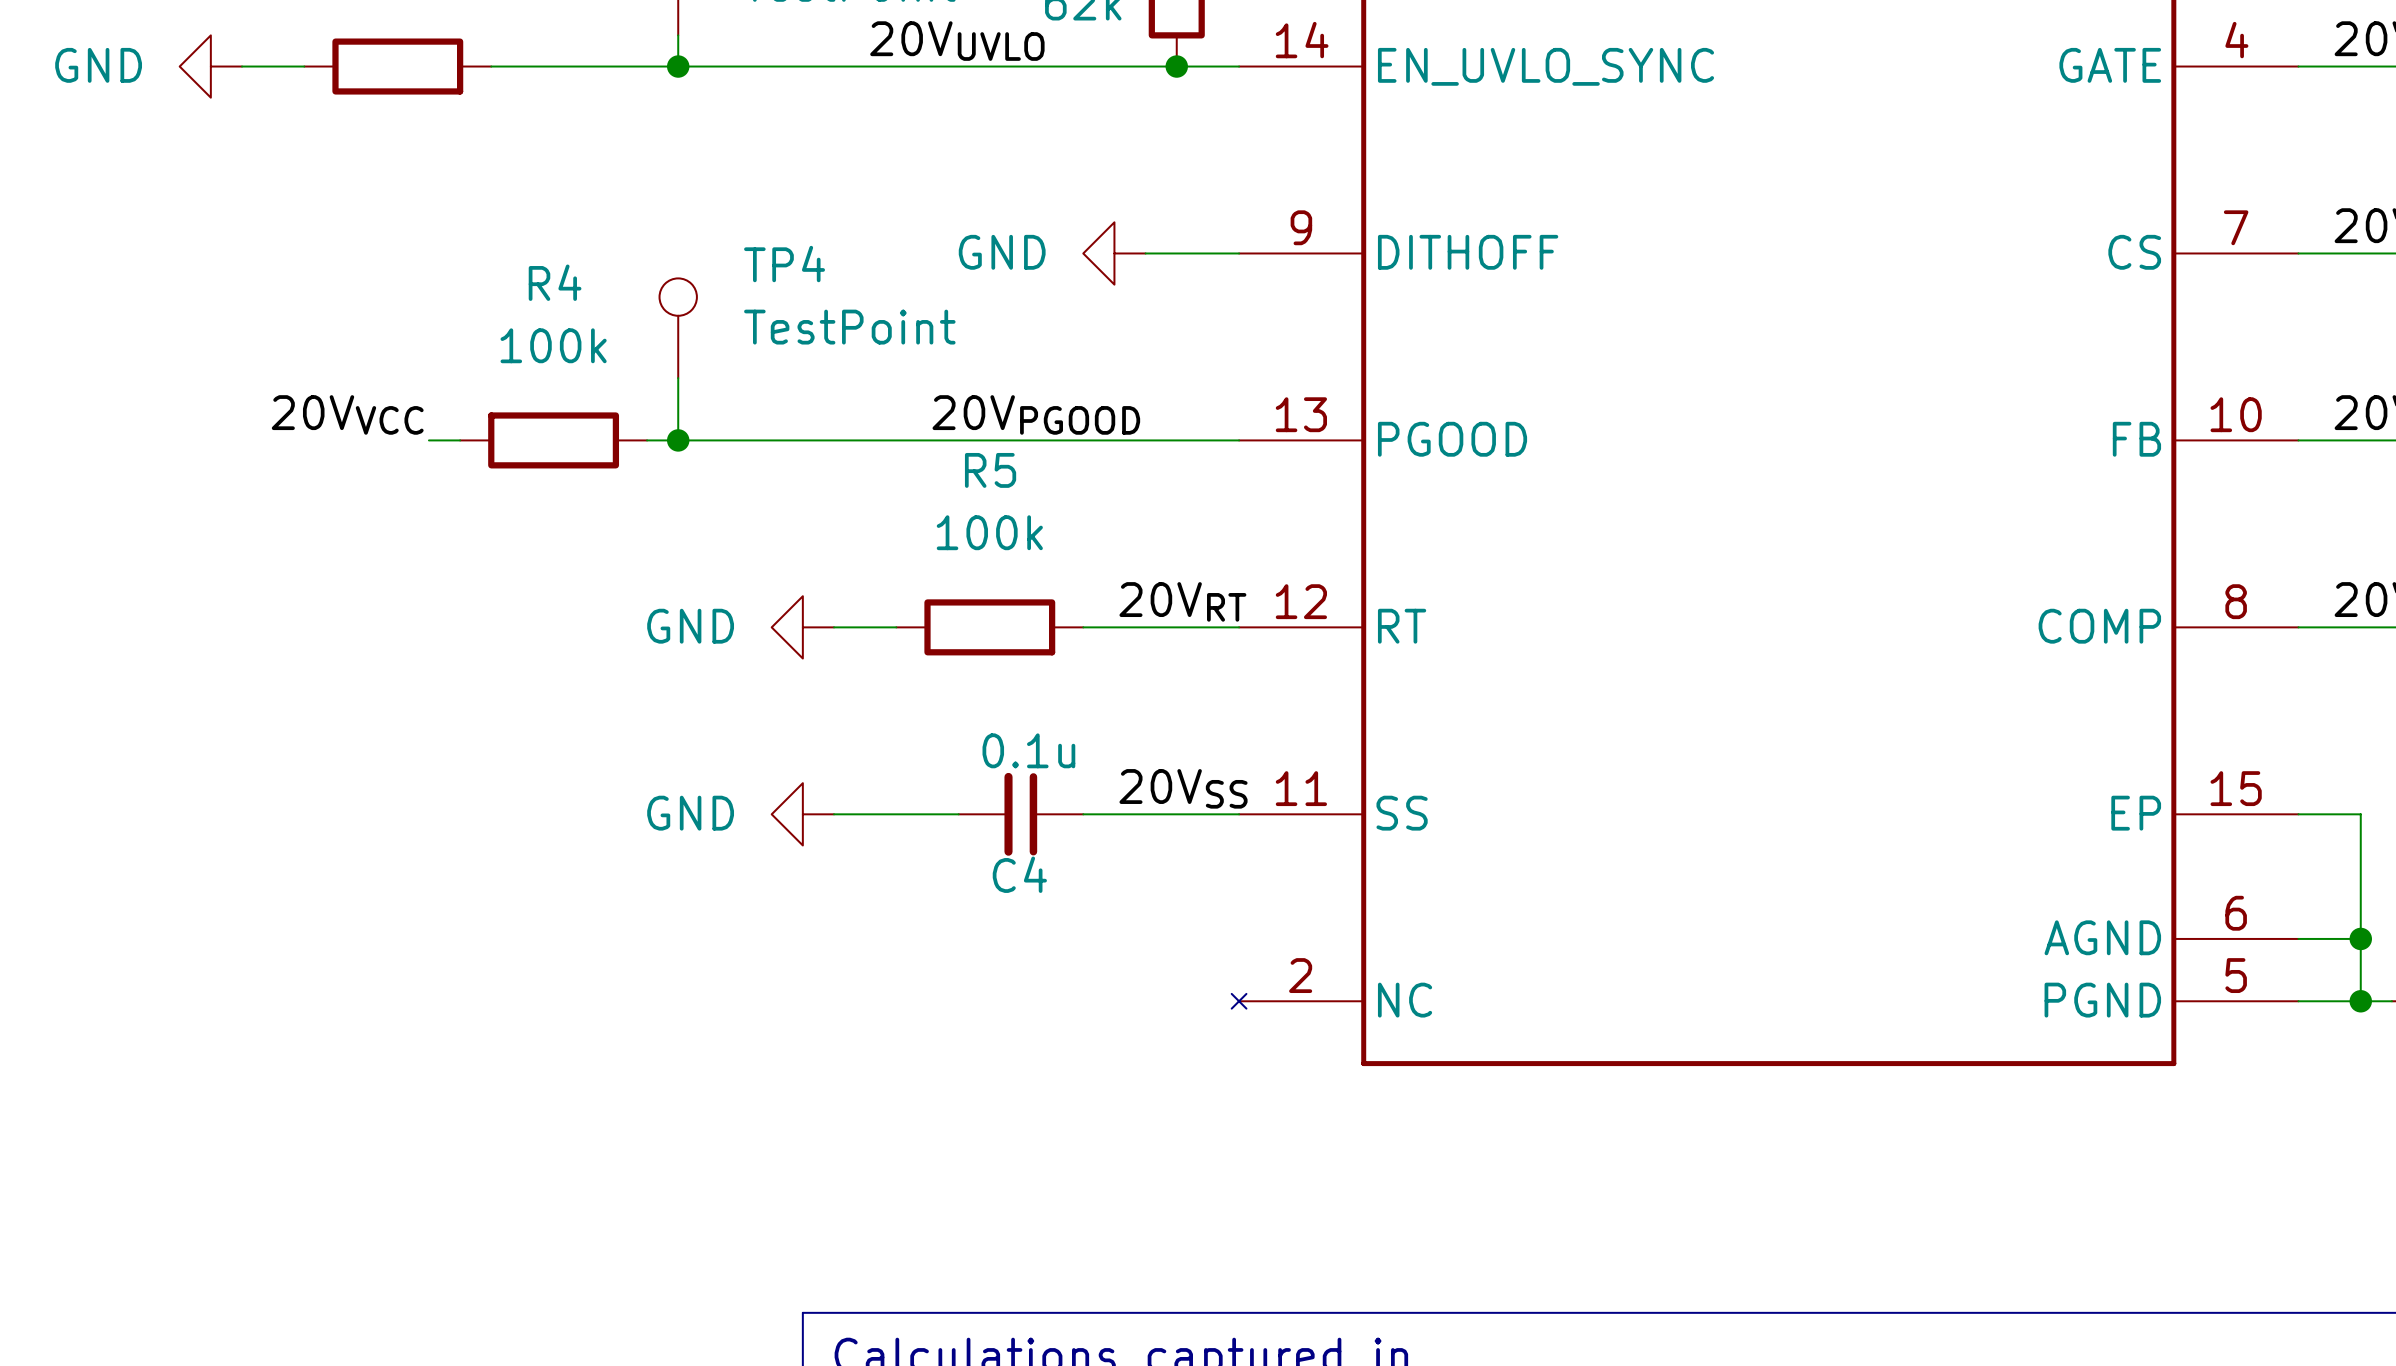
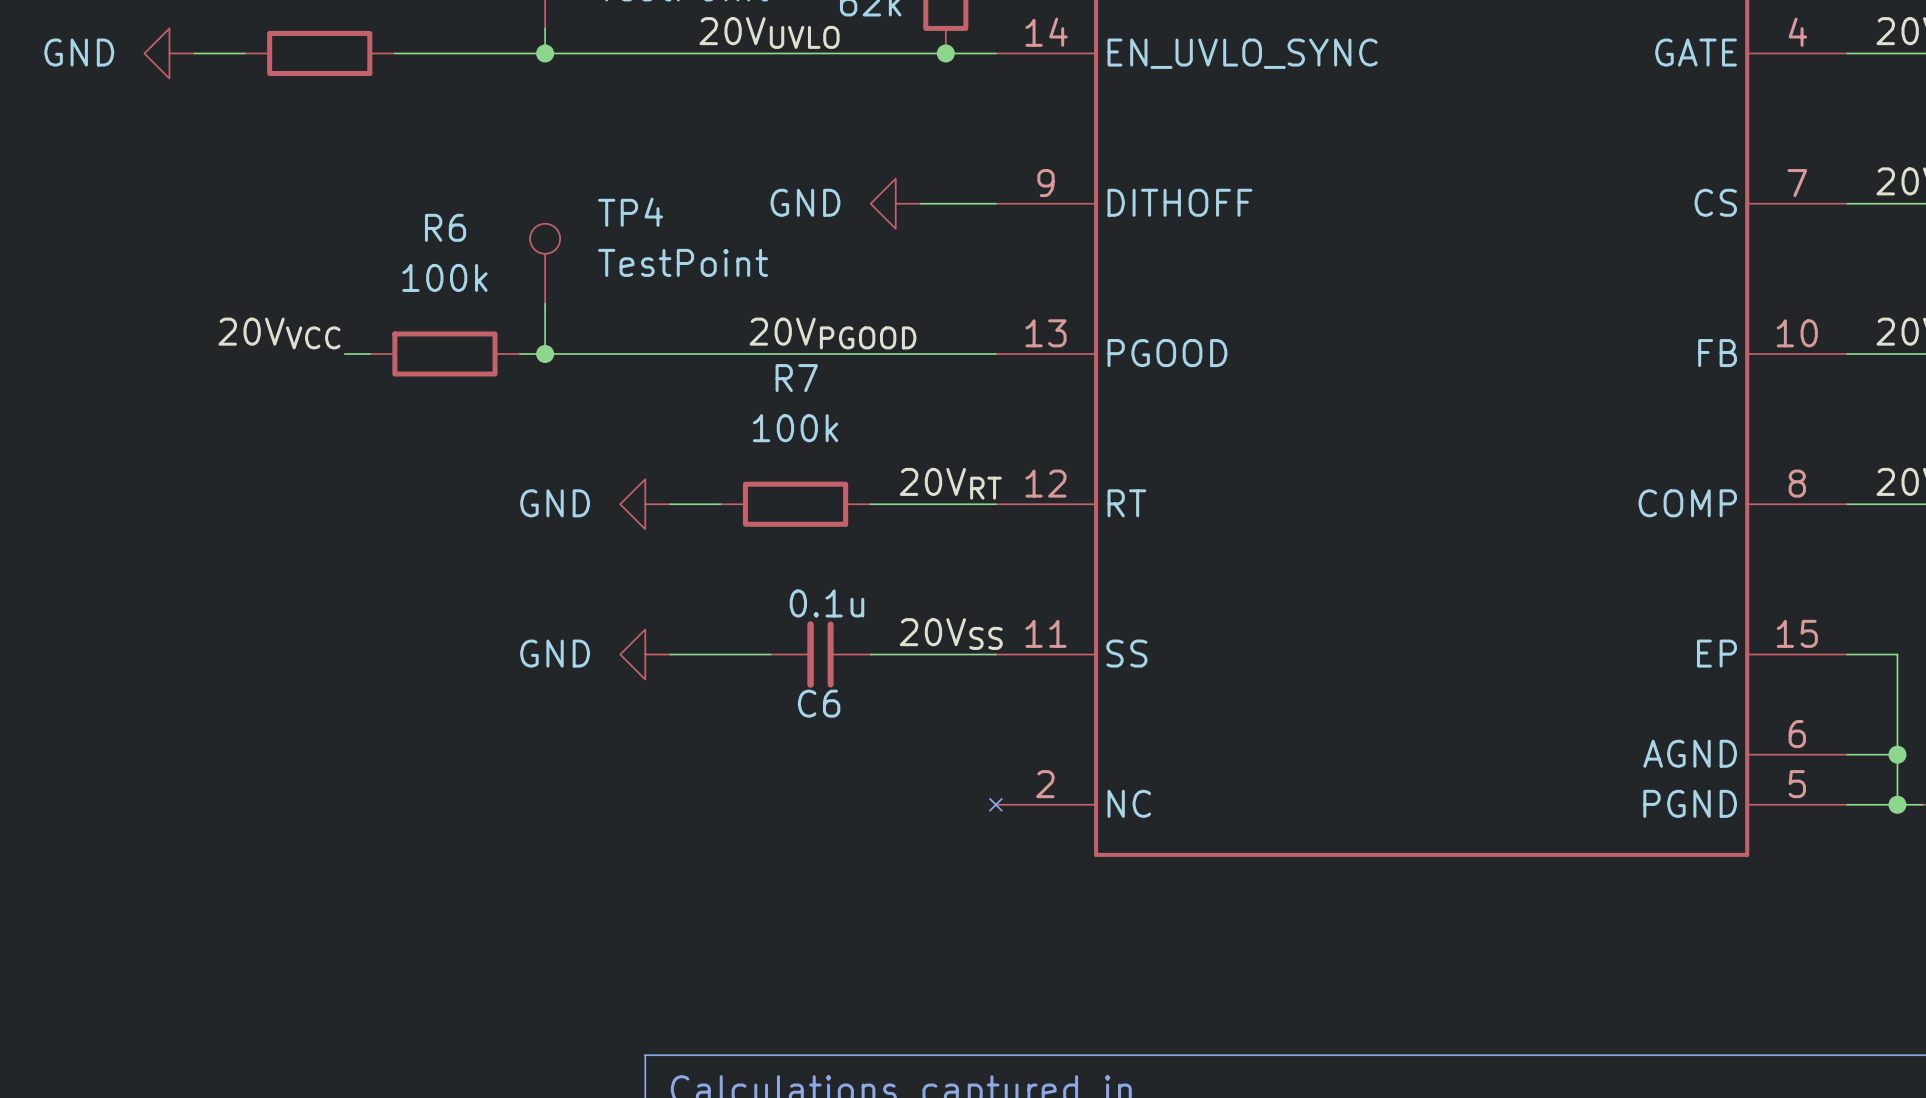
R4 name: R4 (555, 282) -> R6 (445, 227)
R5 name: R5 (990, 470) -> R7 (796, 378)
C4 name: C4 (1019, 874) -> C6 (819, 703)

